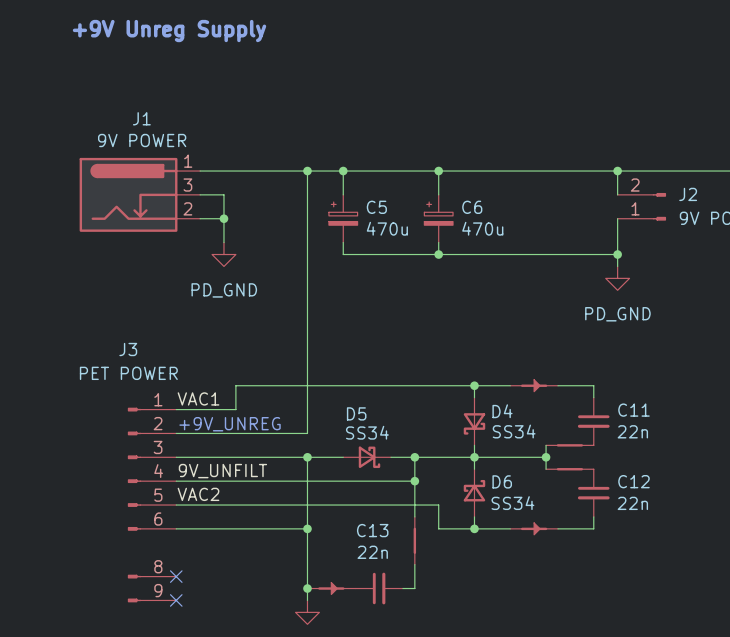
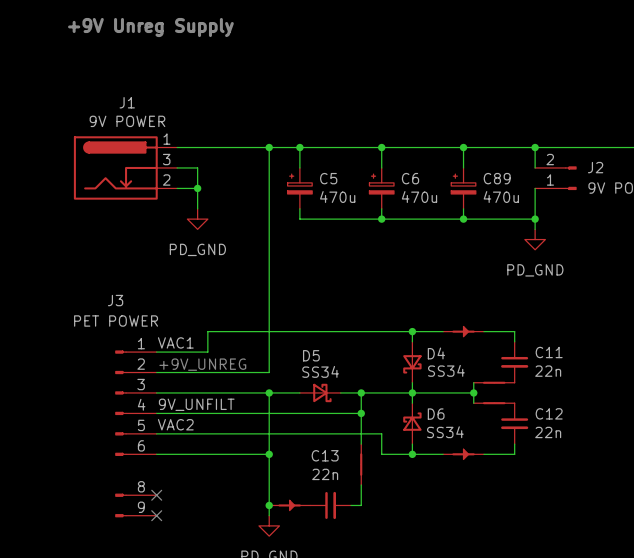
wire: none -> (463, 147) (463, 167)
junction: none -> (463, 147)
C89: none -> 470u (463, 188)
wire: none -> (463, 208) (463, 219)
junction: none -> (463, 219)

